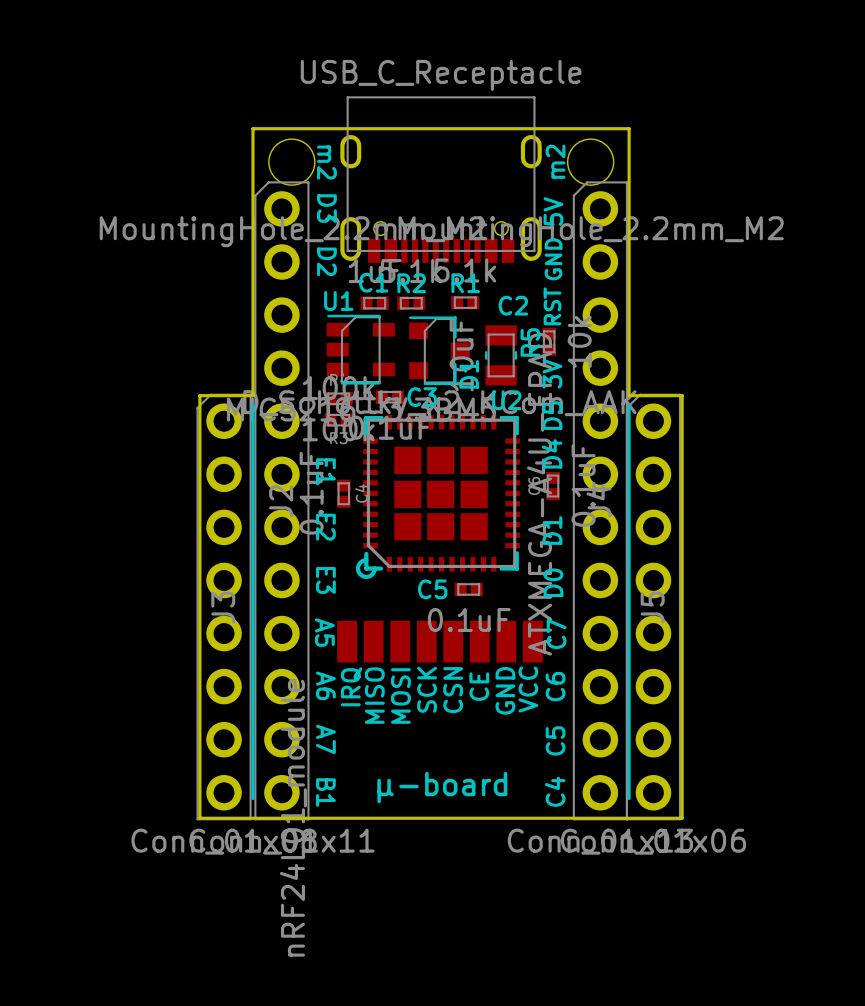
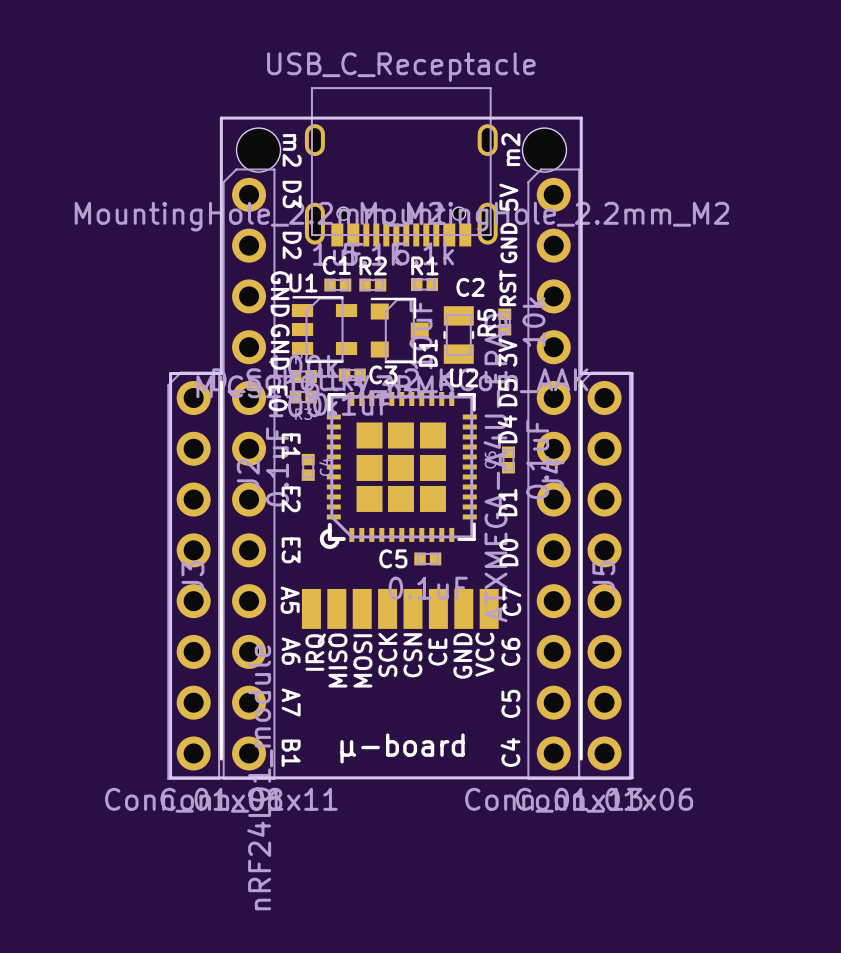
text: none -> GND (280, 294)
text: none -> GND (280, 347)
text: none -> E0 (278, 398)

